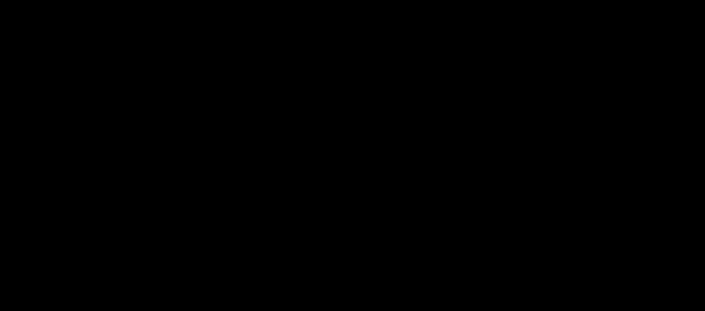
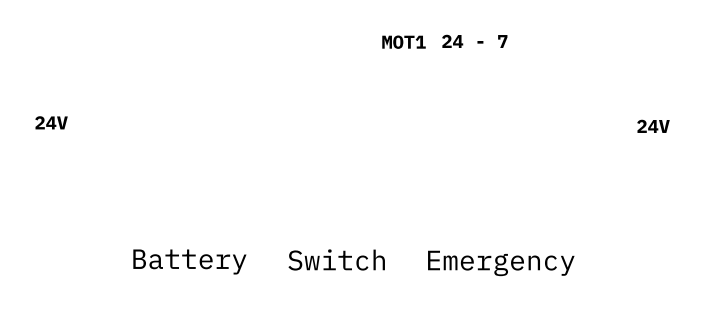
text: none -> 24 - 7 (474, 41)
text: none -> MOT1 (404, 42)
text: none -> 24V (51, 122)
text: none -> 24V (653, 126)
text: none -> Switch (336, 259)
text: none -> Battery (189, 262)
text: none -> Emergency (501, 263)

